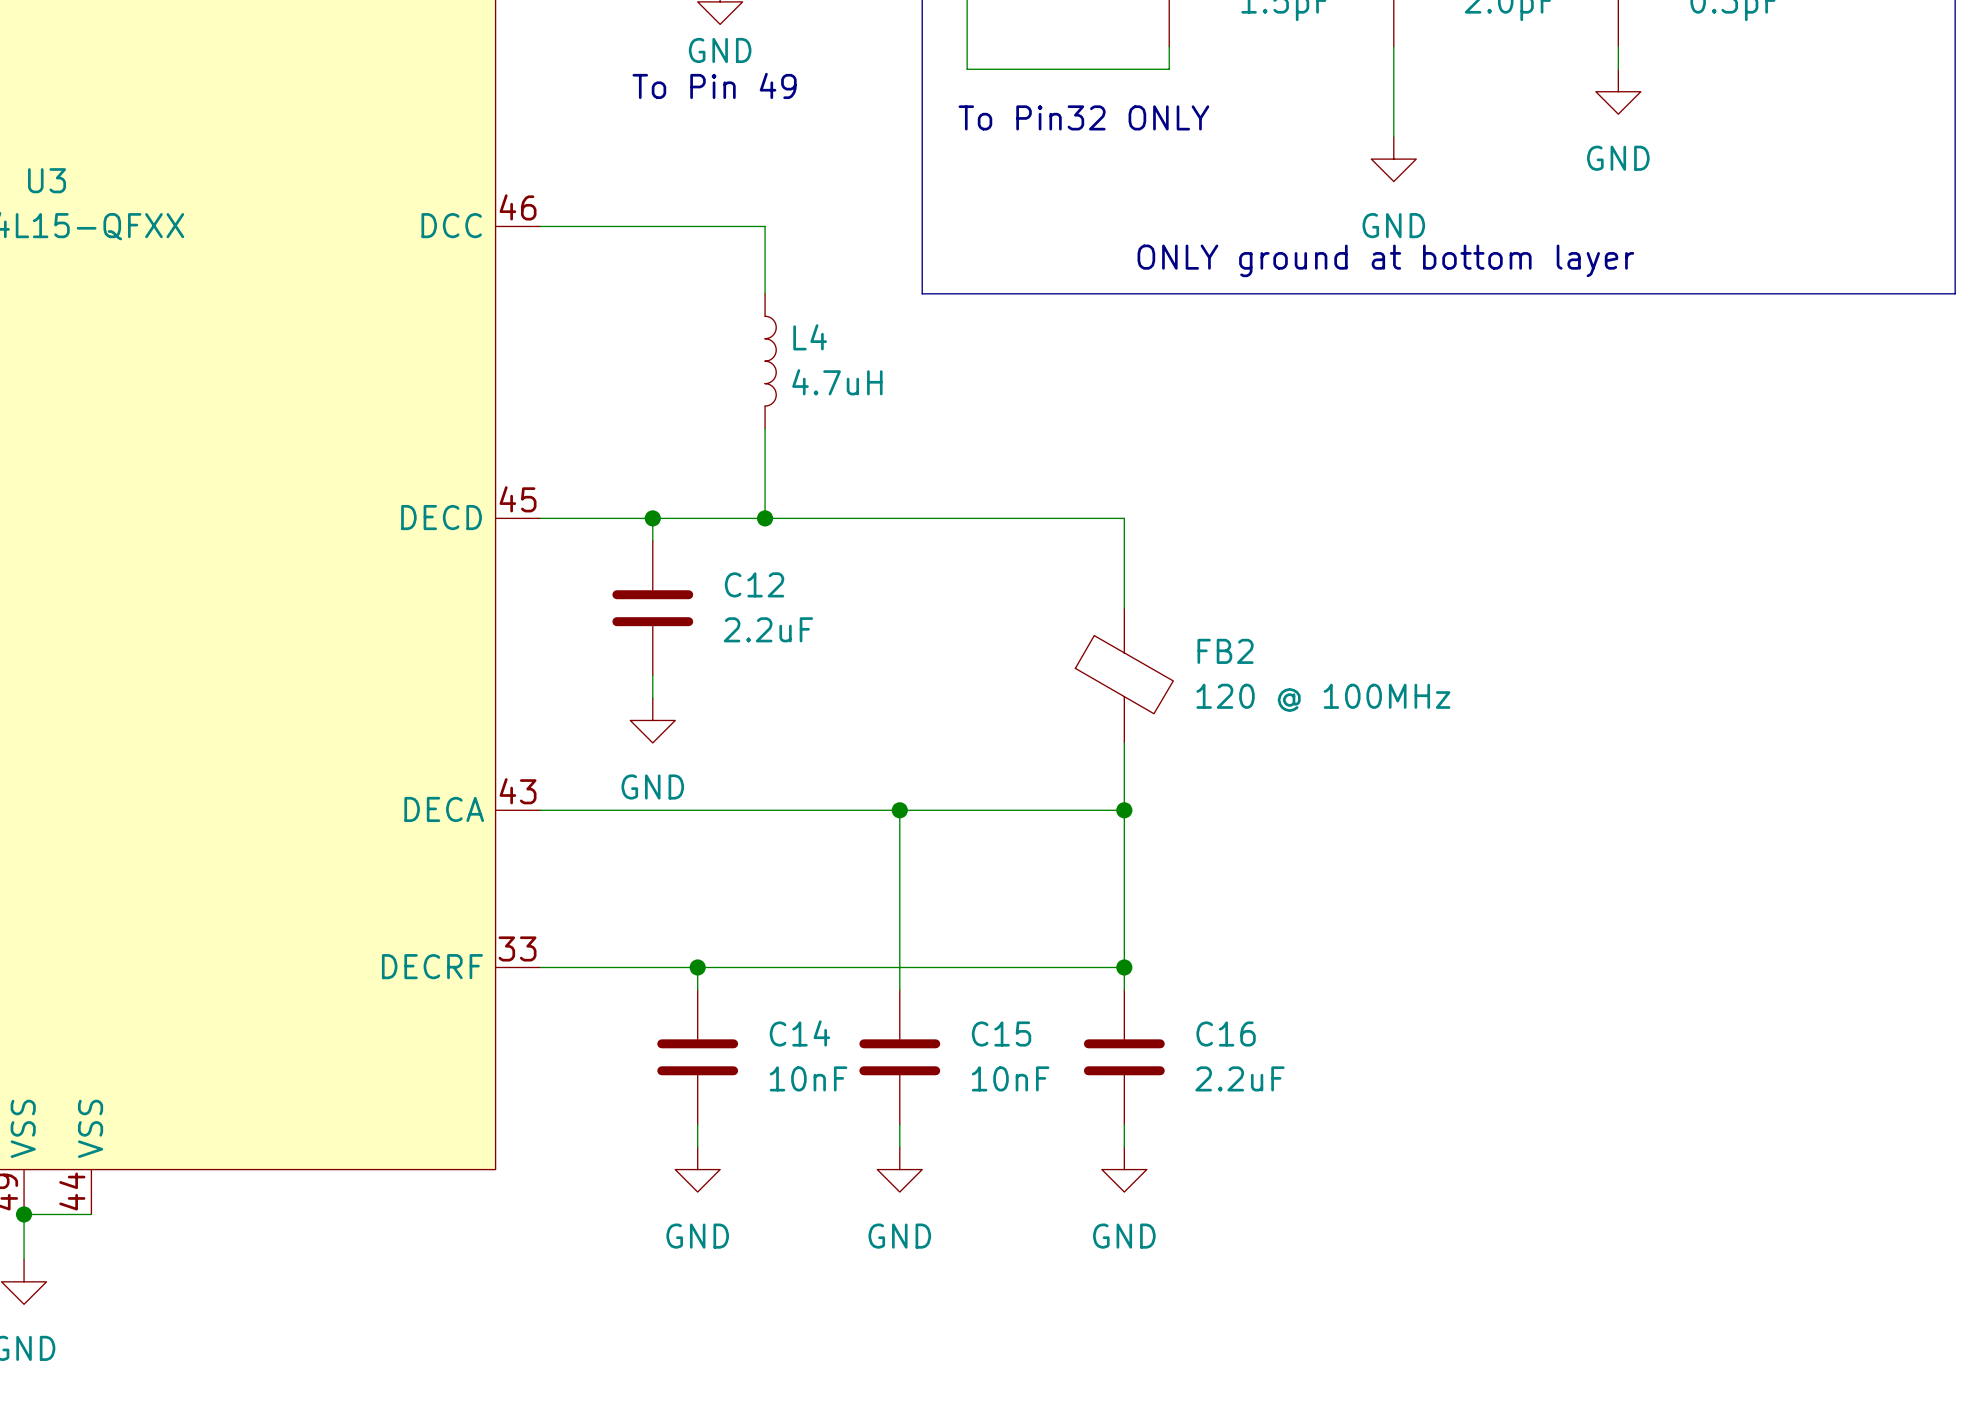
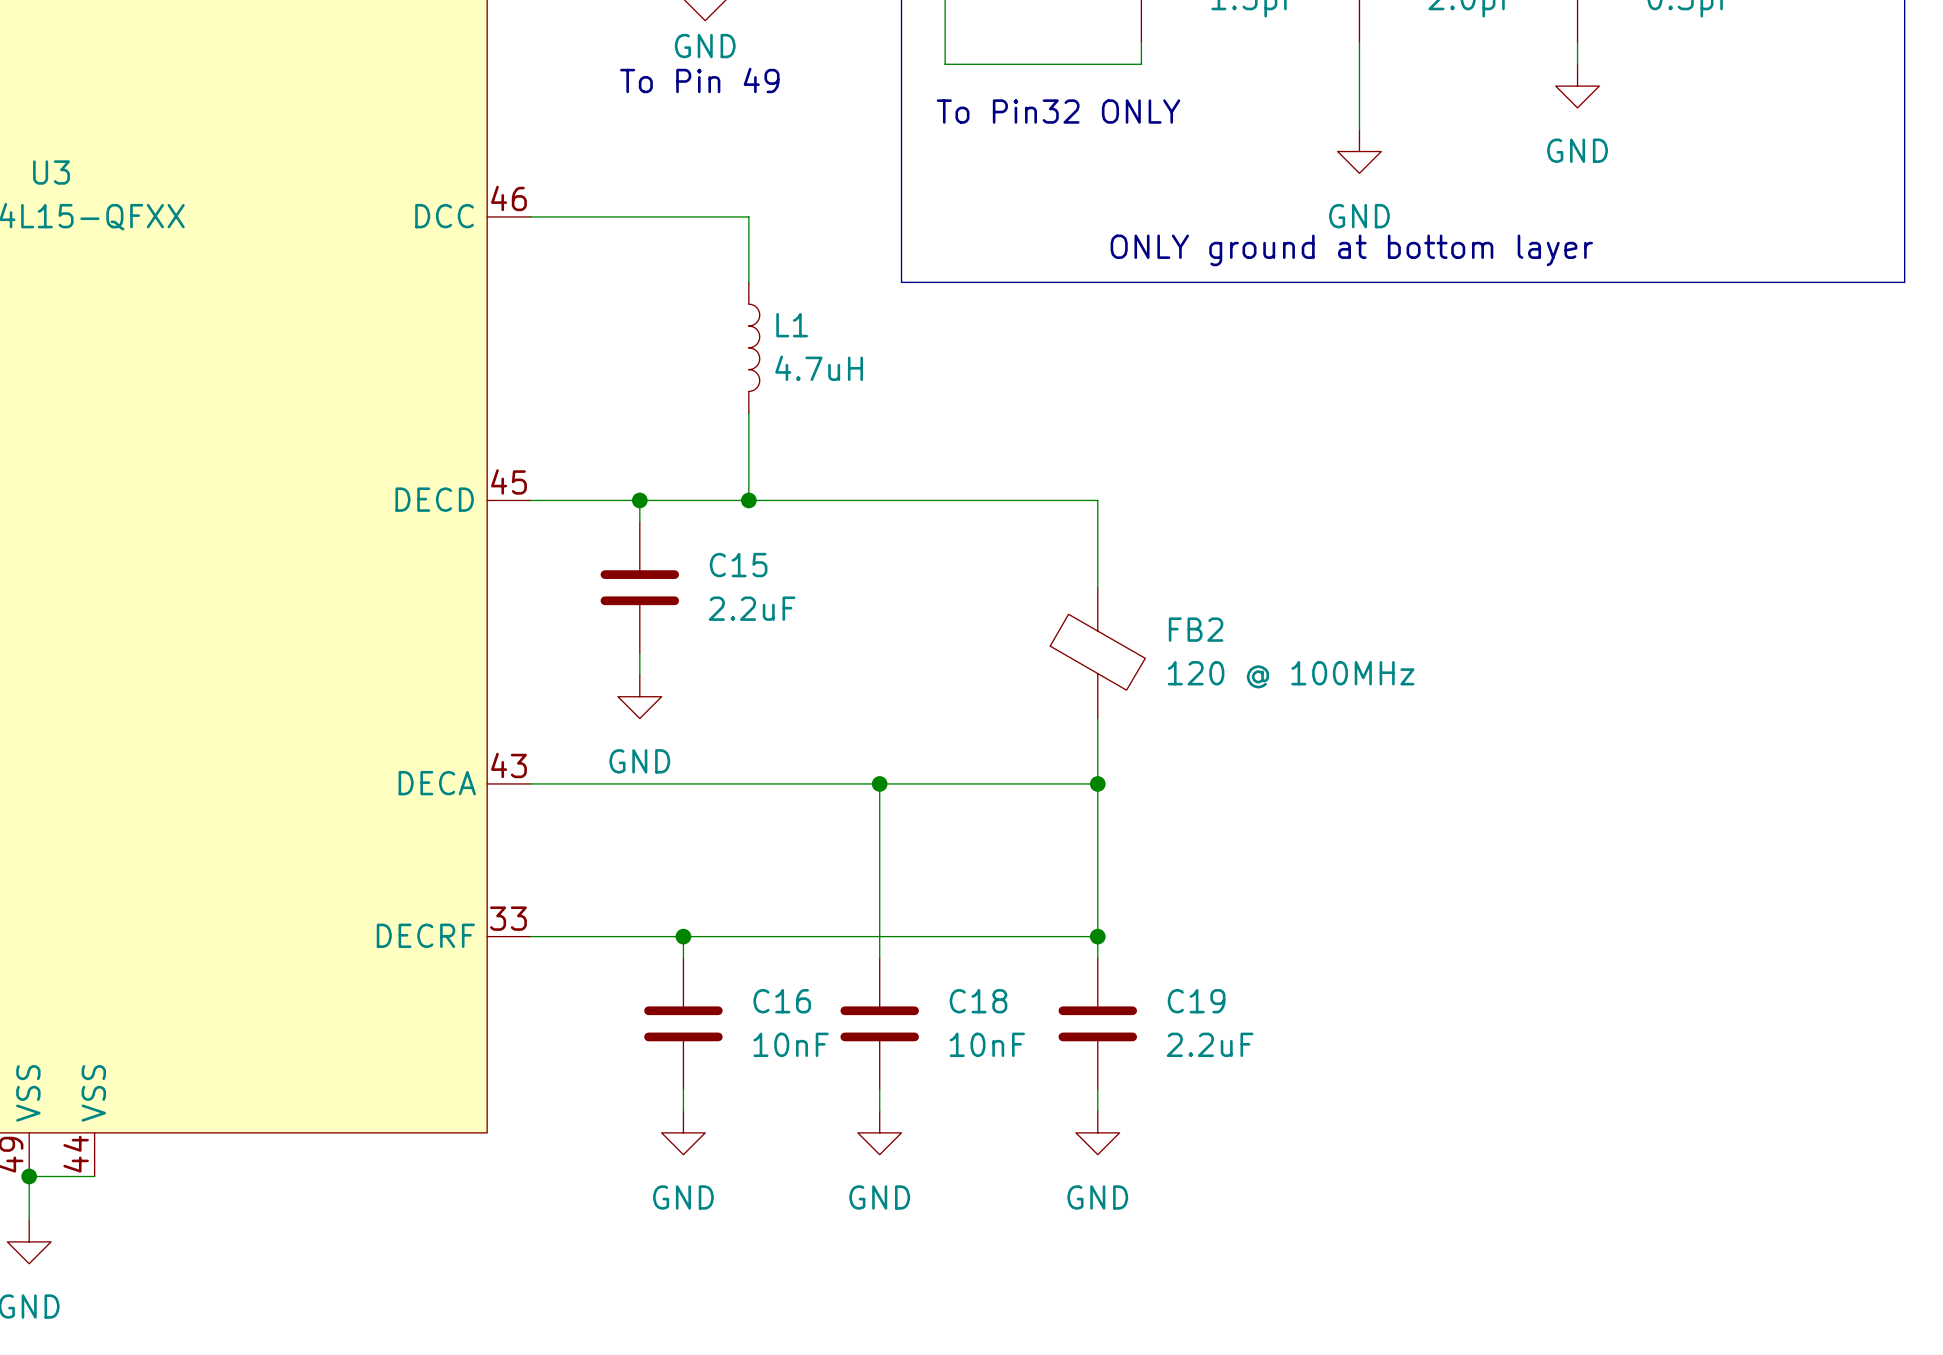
L4 name: L4 (810, 337) -> L1 (792, 325)
C12 name: C12 (754, 584) -> C15 (738, 565)
C14 name: C14 (799, 1033) -> C16 (782, 1001)
C15 name: C15 (1001, 1034) -> C18 (978, 1001)
C16 name: C16 (1226, 1034) -> C19 (1196, 1001)

